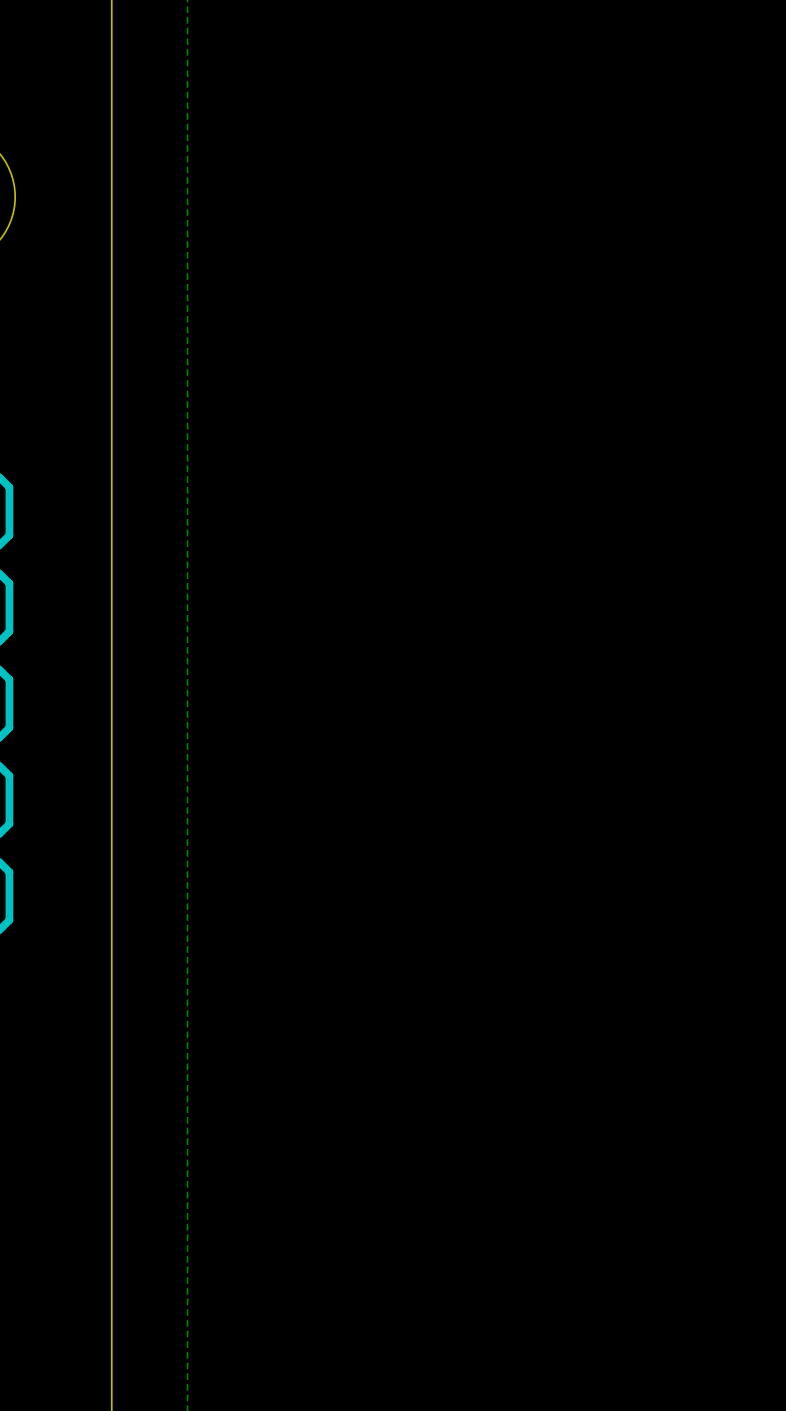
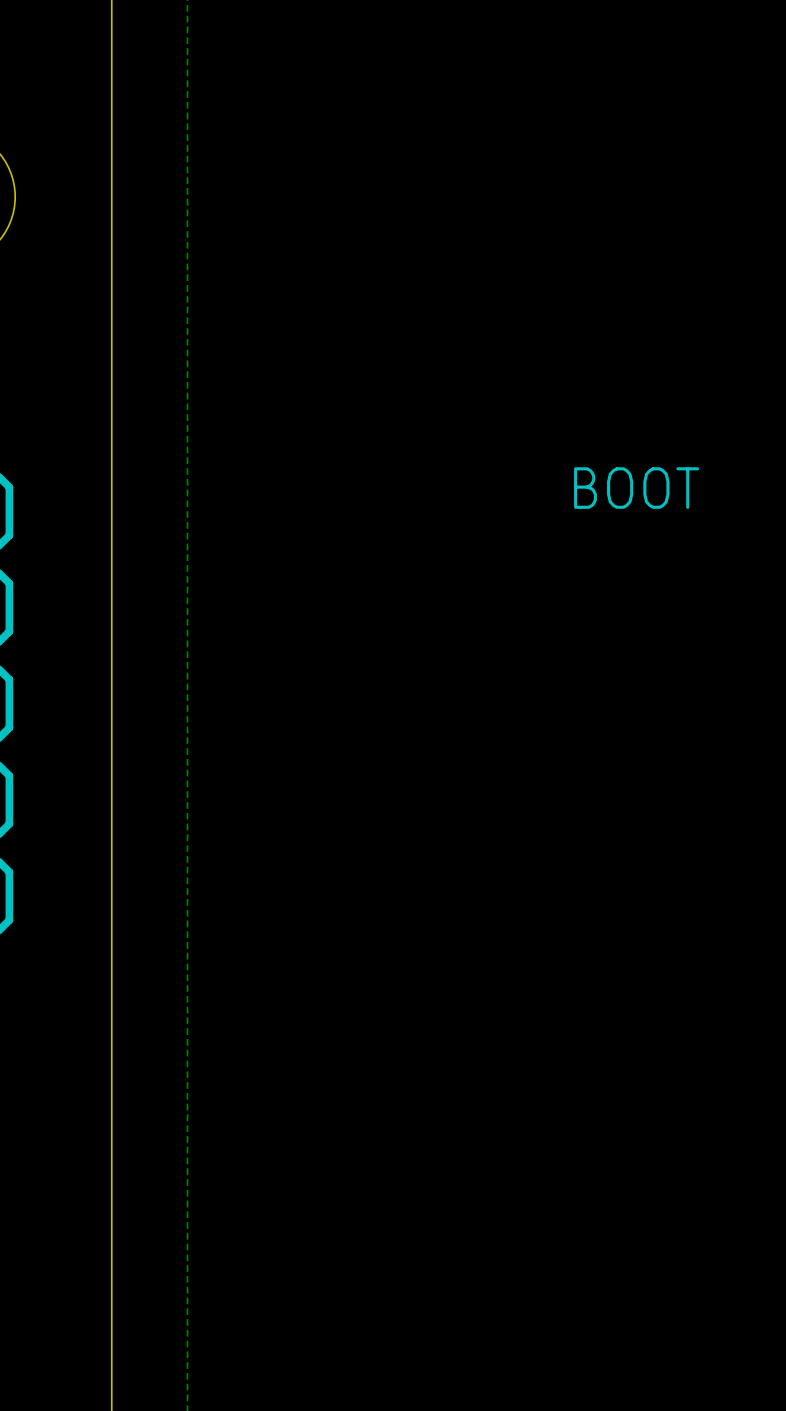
text: none -> BOOT (636, 488)

